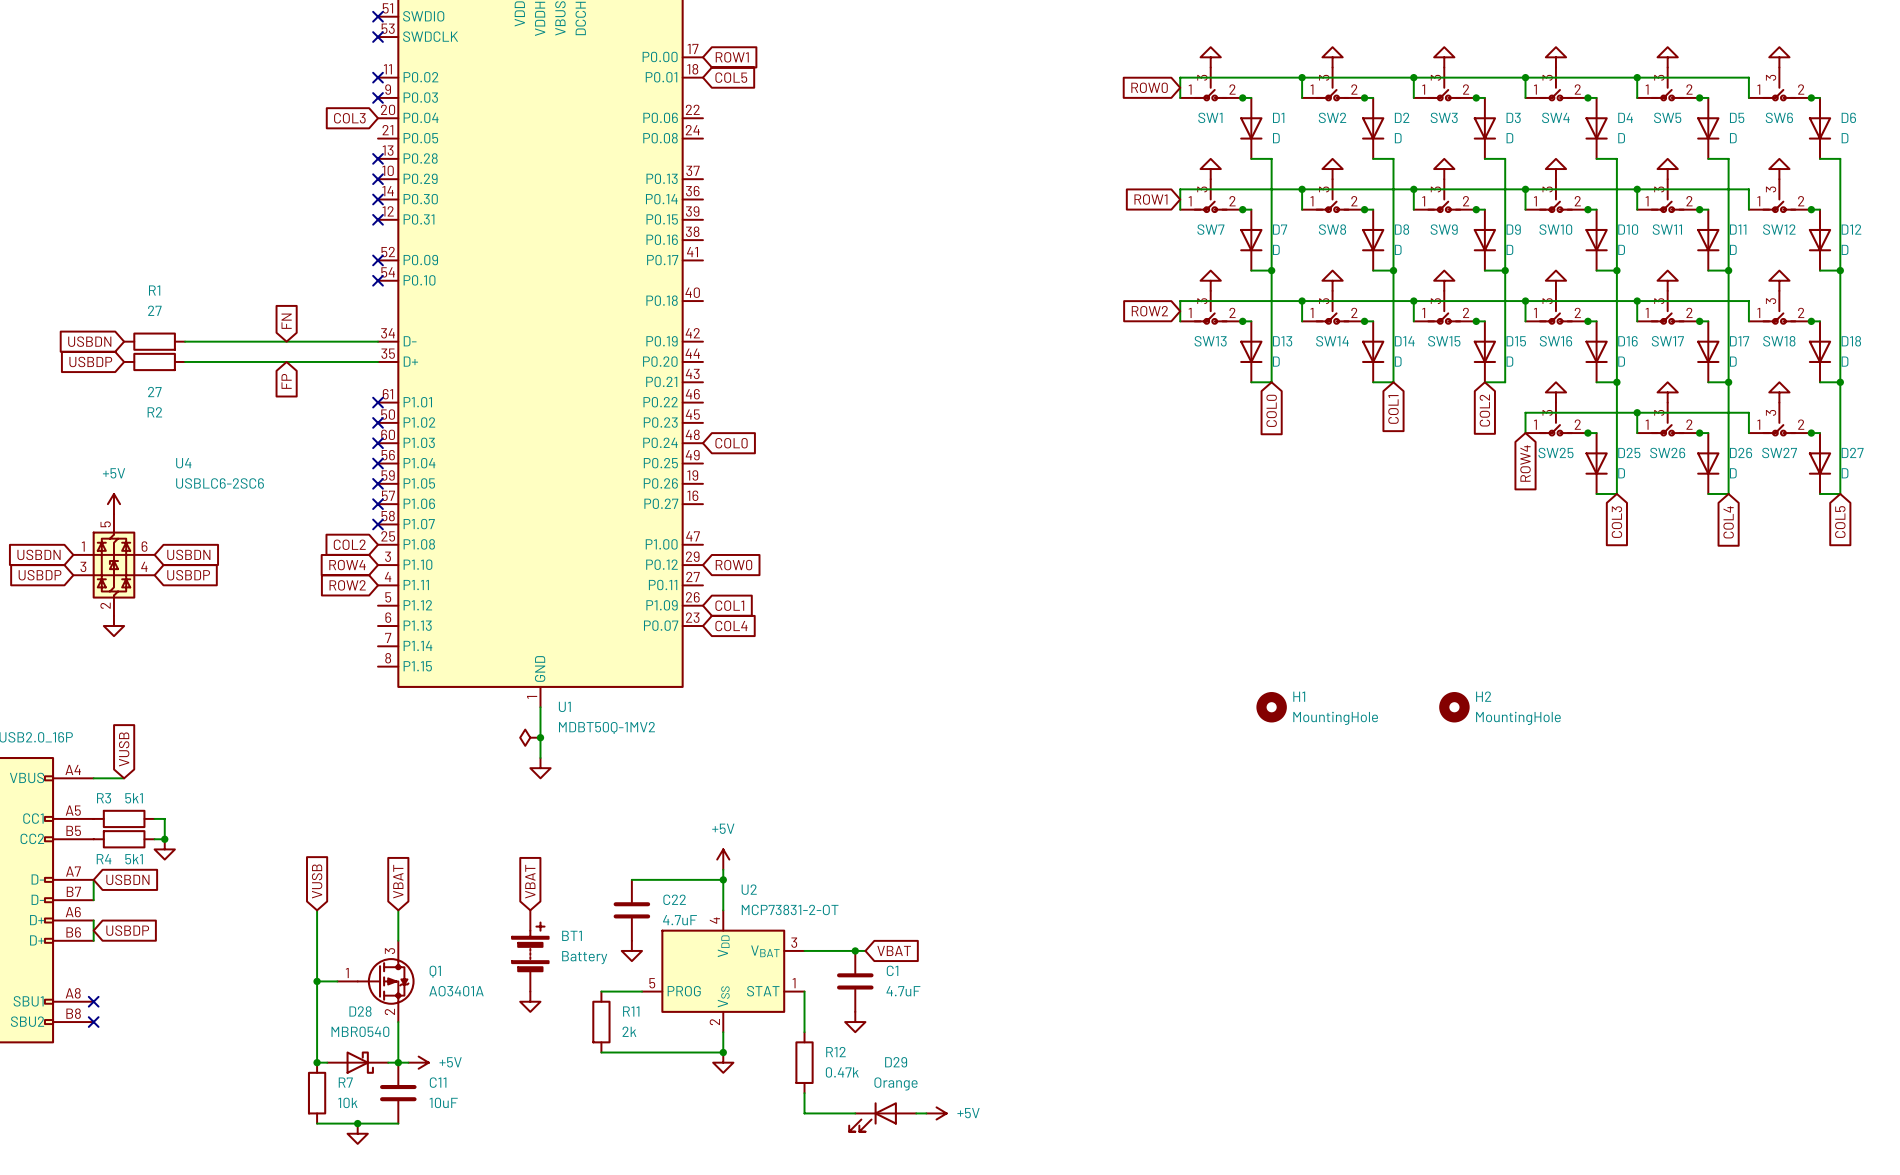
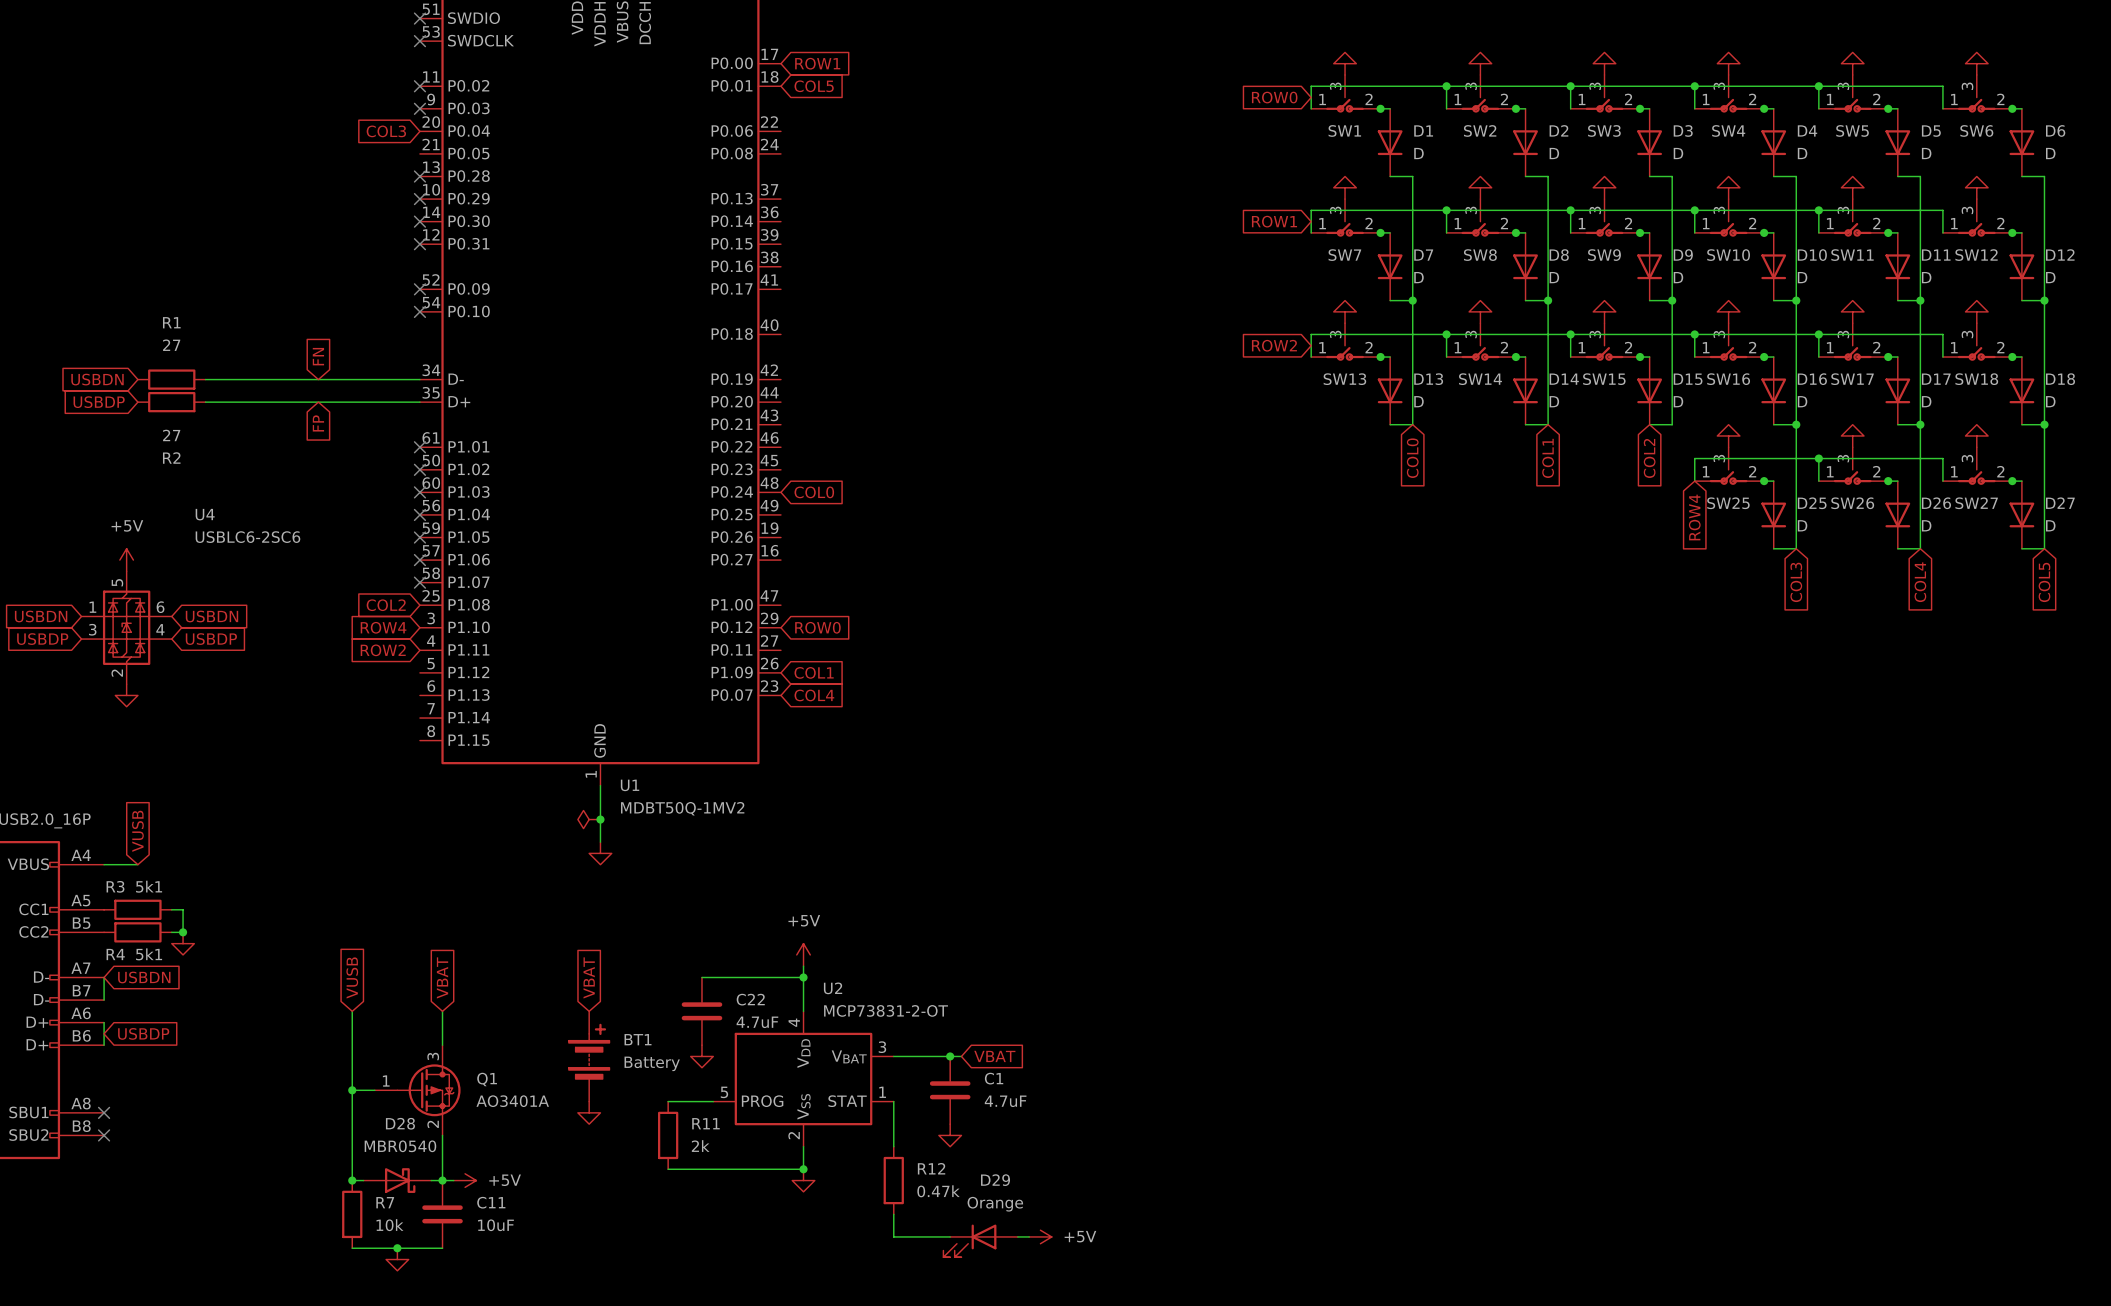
H1: MountingHole (1271, 707) -> none
H2: MountingHole (1454, 707) -> none

